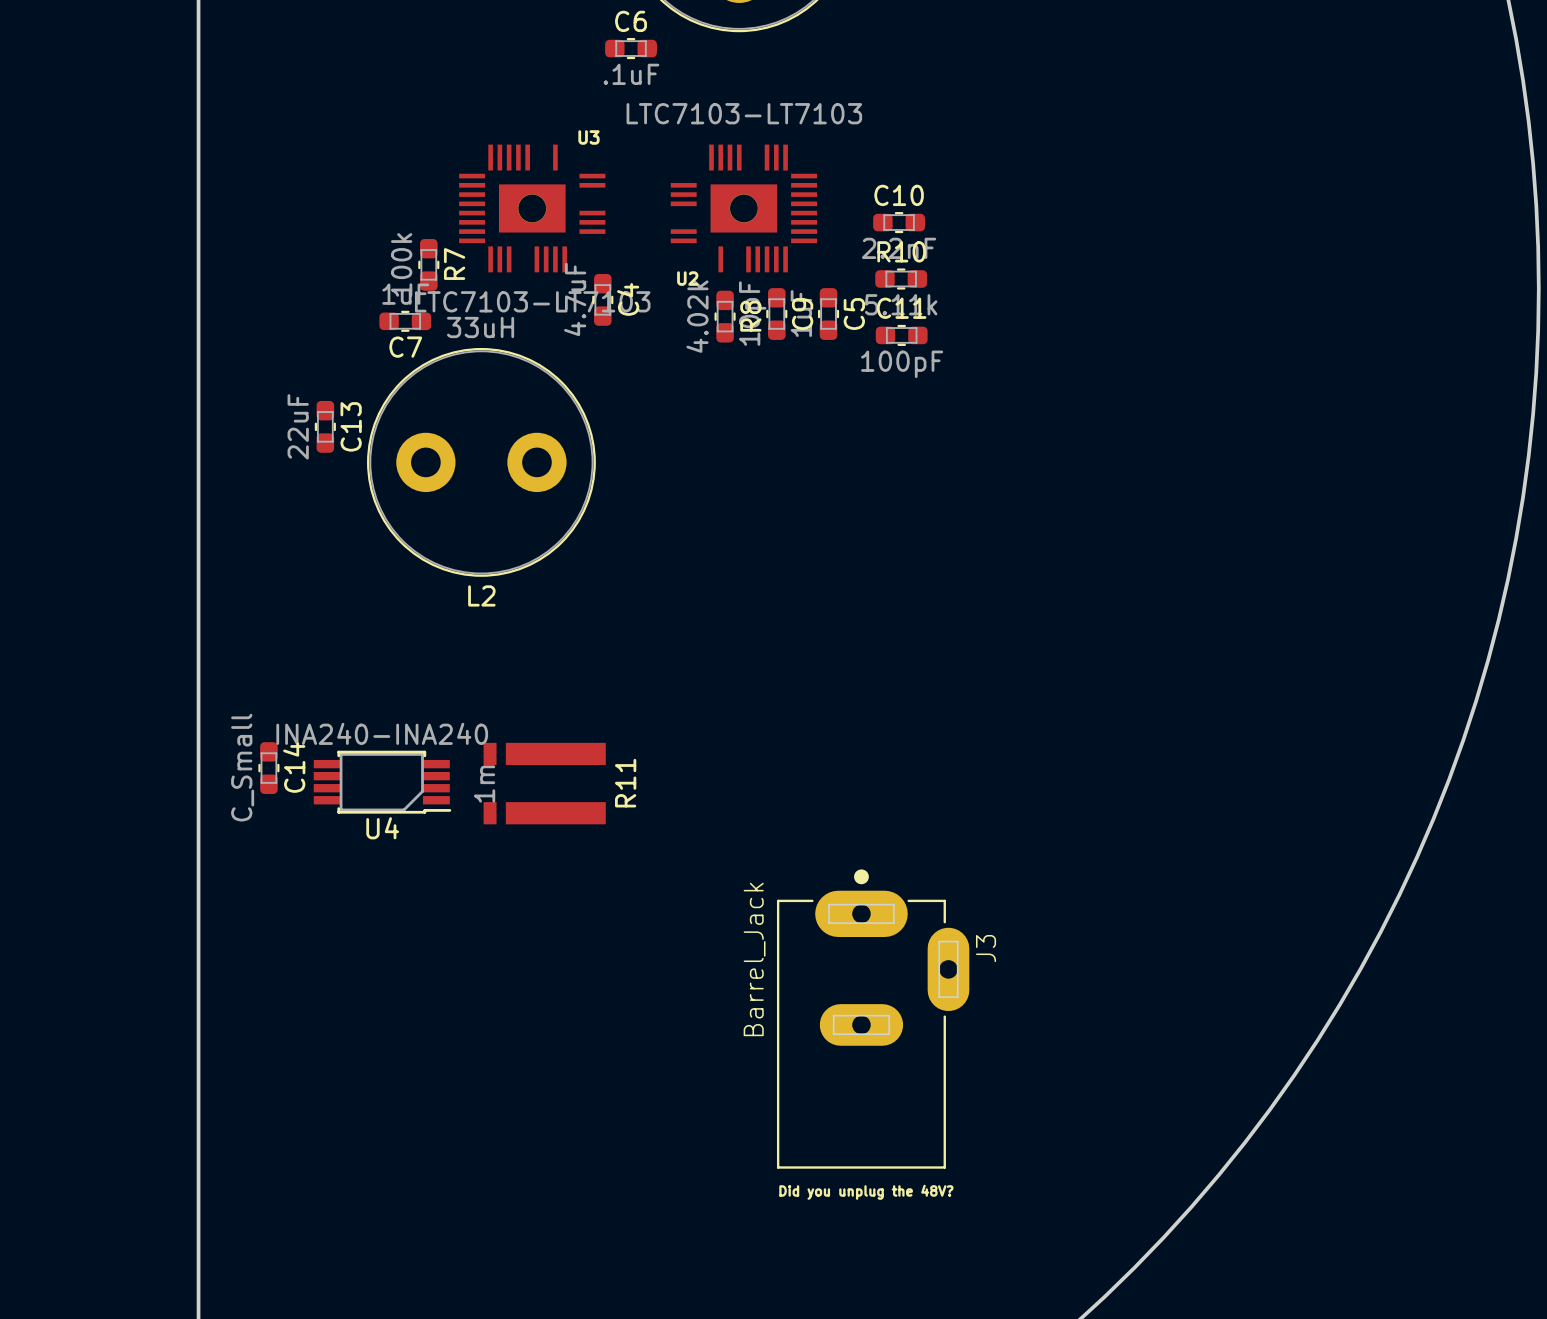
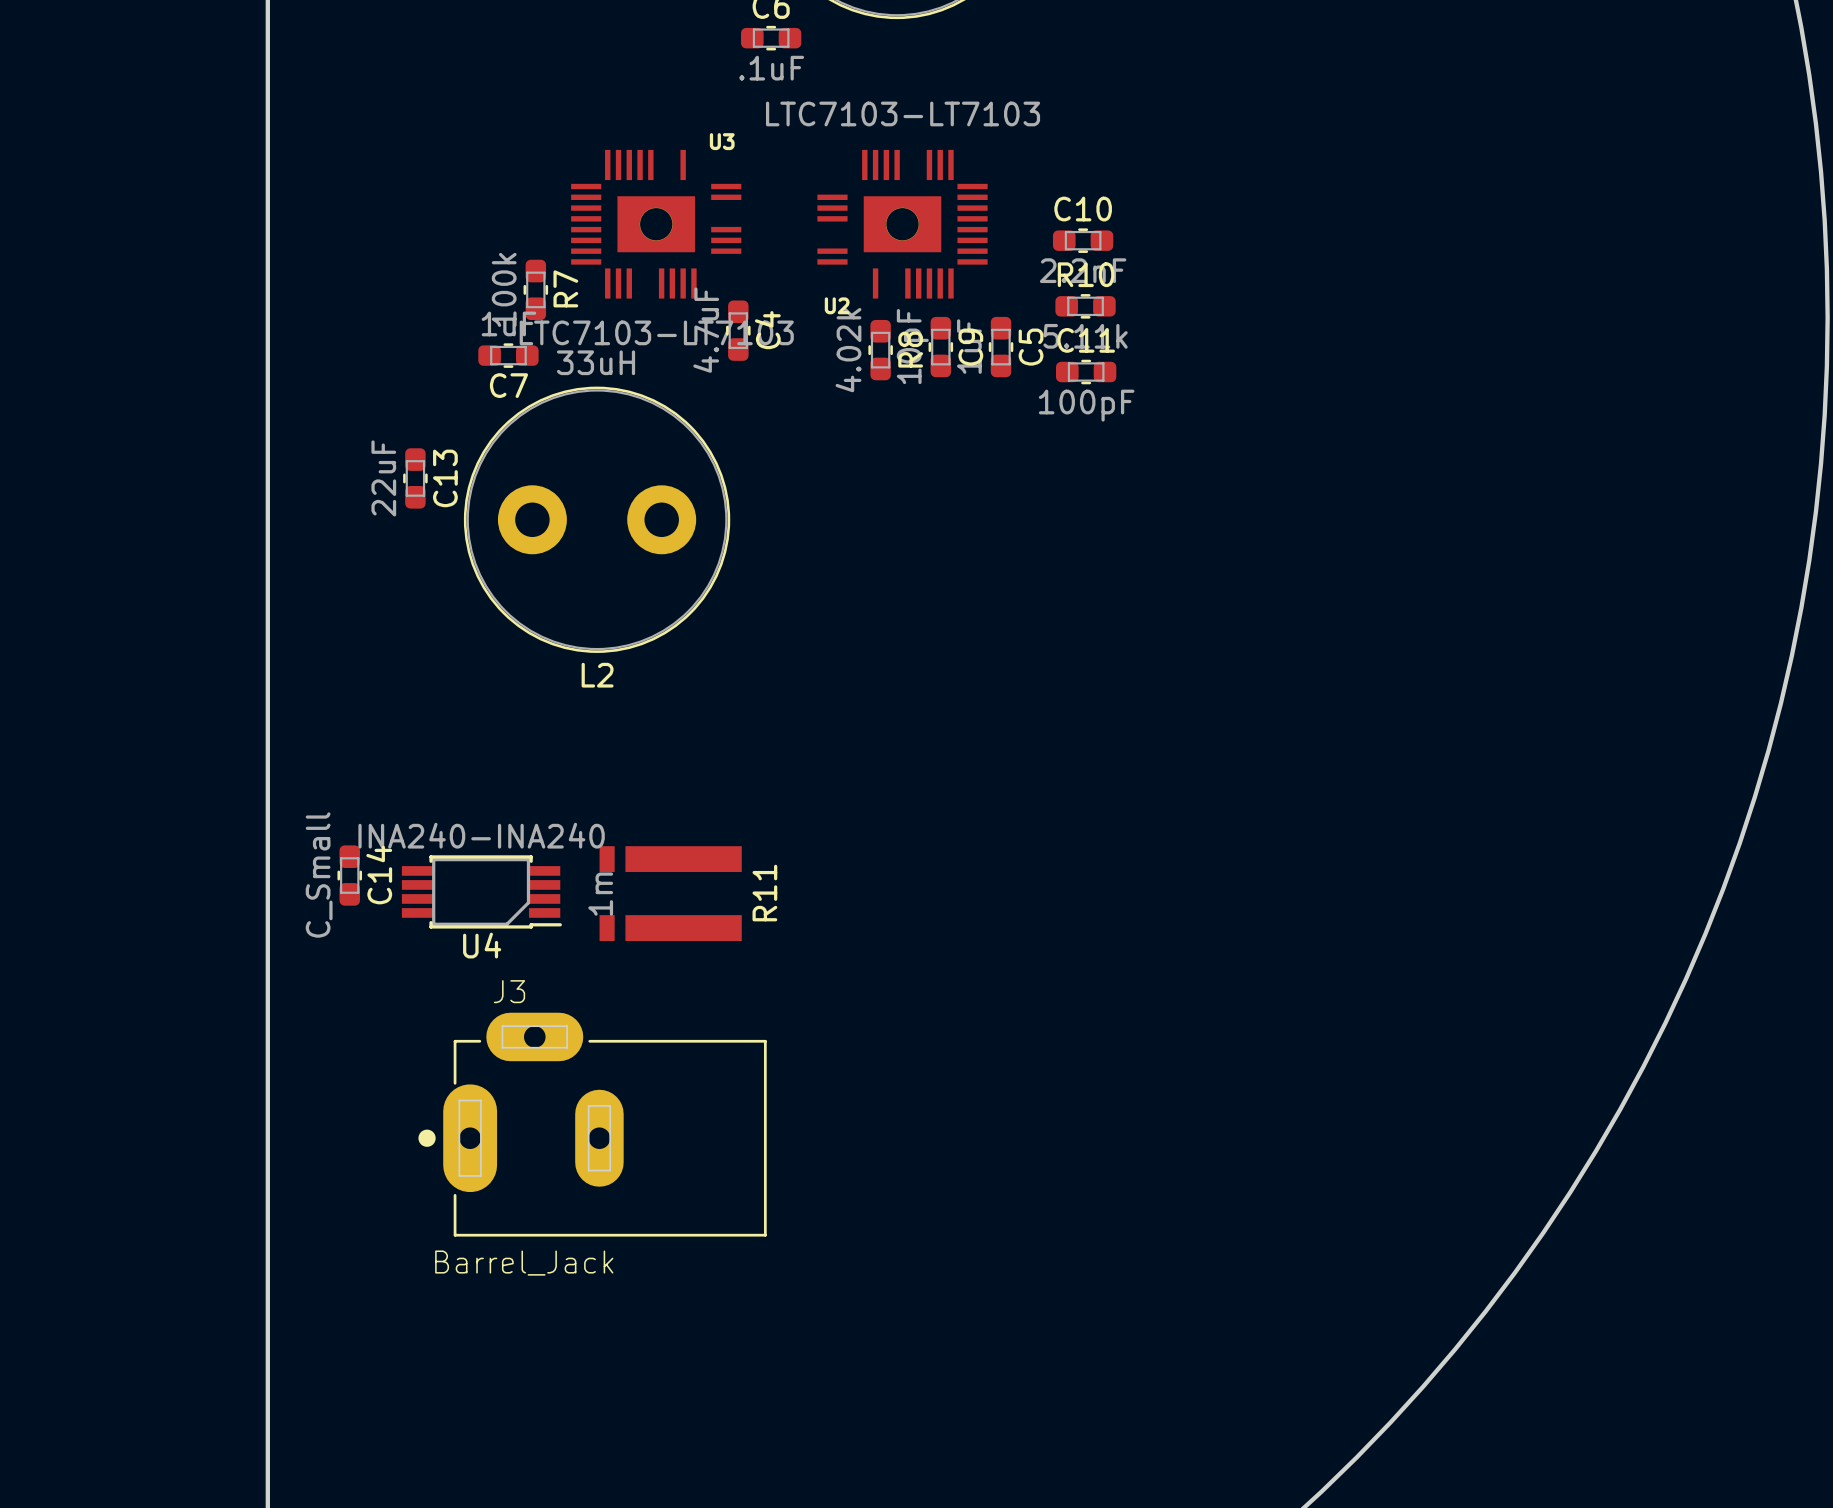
J3 rotation: 0° (873, 1019) -> 90° counterclockwise (592, 1124)
J3 position: (873, 1019) -> (592, 1124)
text: Did you unplug the 48V? (866, 1192) -> none

